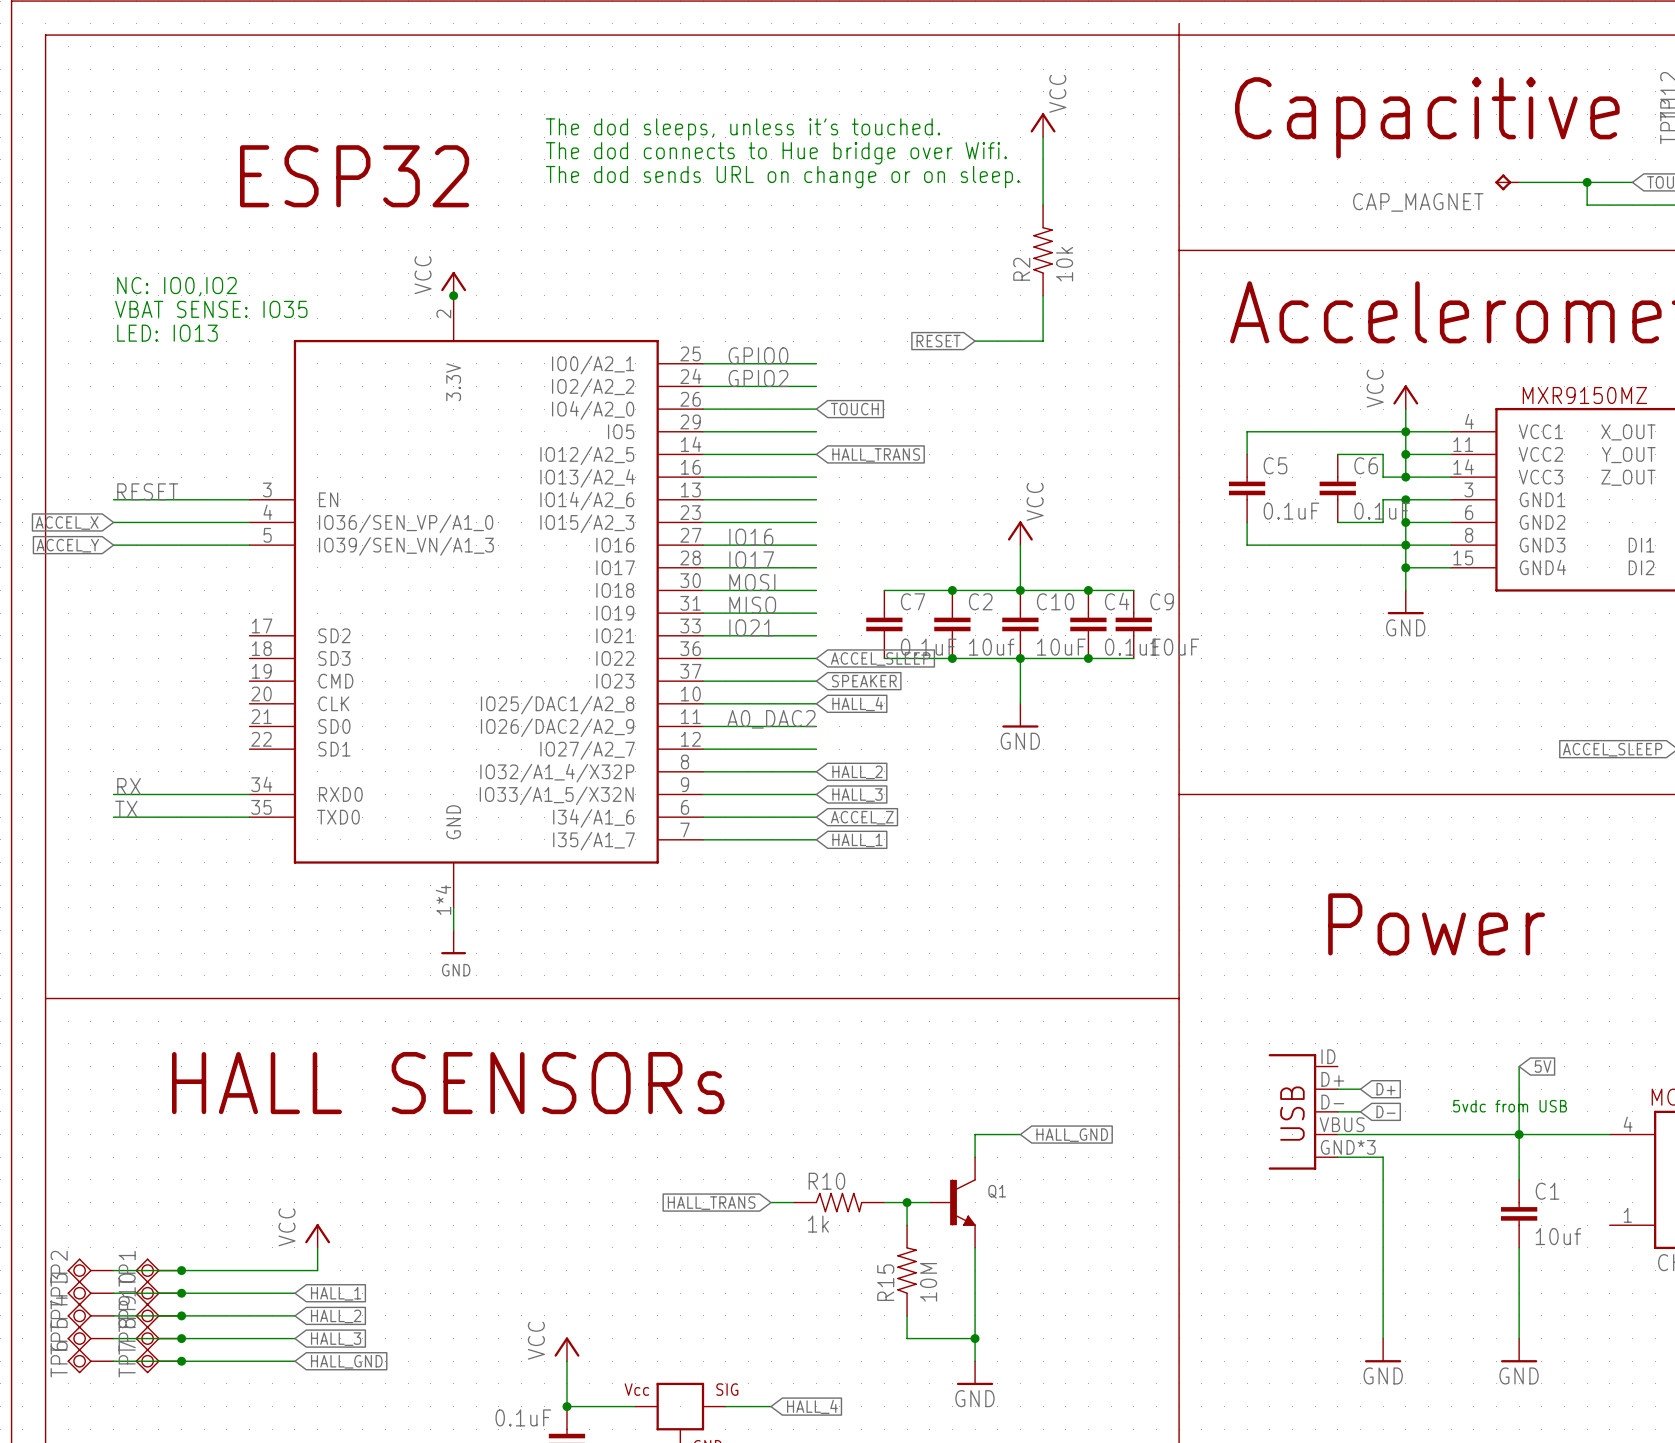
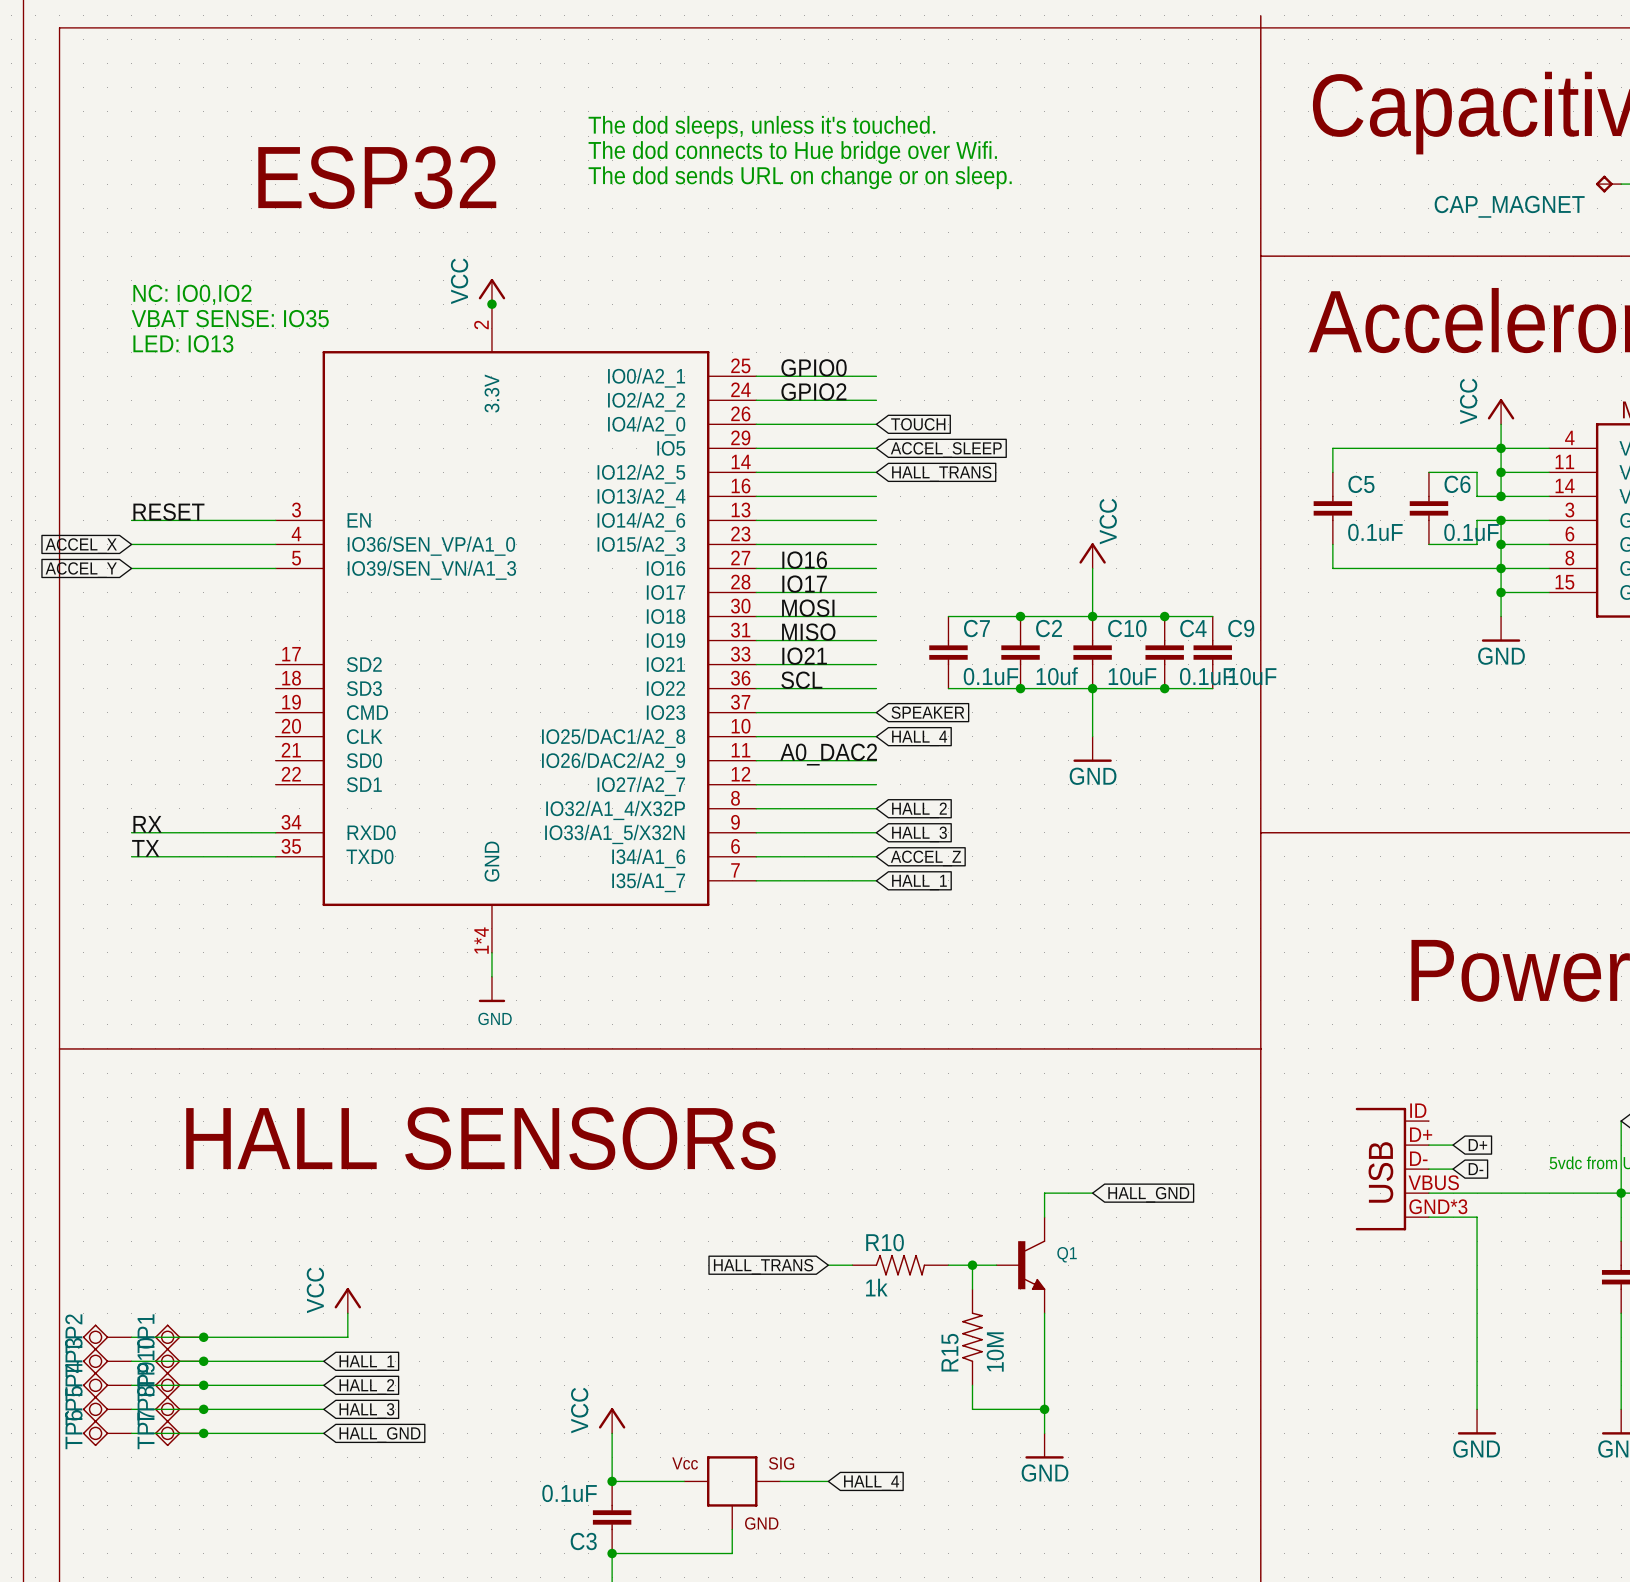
power symbol: VCC (1043, 125) -> none
wire: (1043, 137) (1043, 205) -> none
R2: 10k (1043, 250) -> none
wire: (1043, 295) (1043, 341) (975, 341) -> none
global label: RESET (938, 341) -> none
global label: none -> ACCEL_SLEEP (946, 449)
label: none -> SCL (801, 680)
global label: ACCEL_SLEEP (880, 659) -> none

